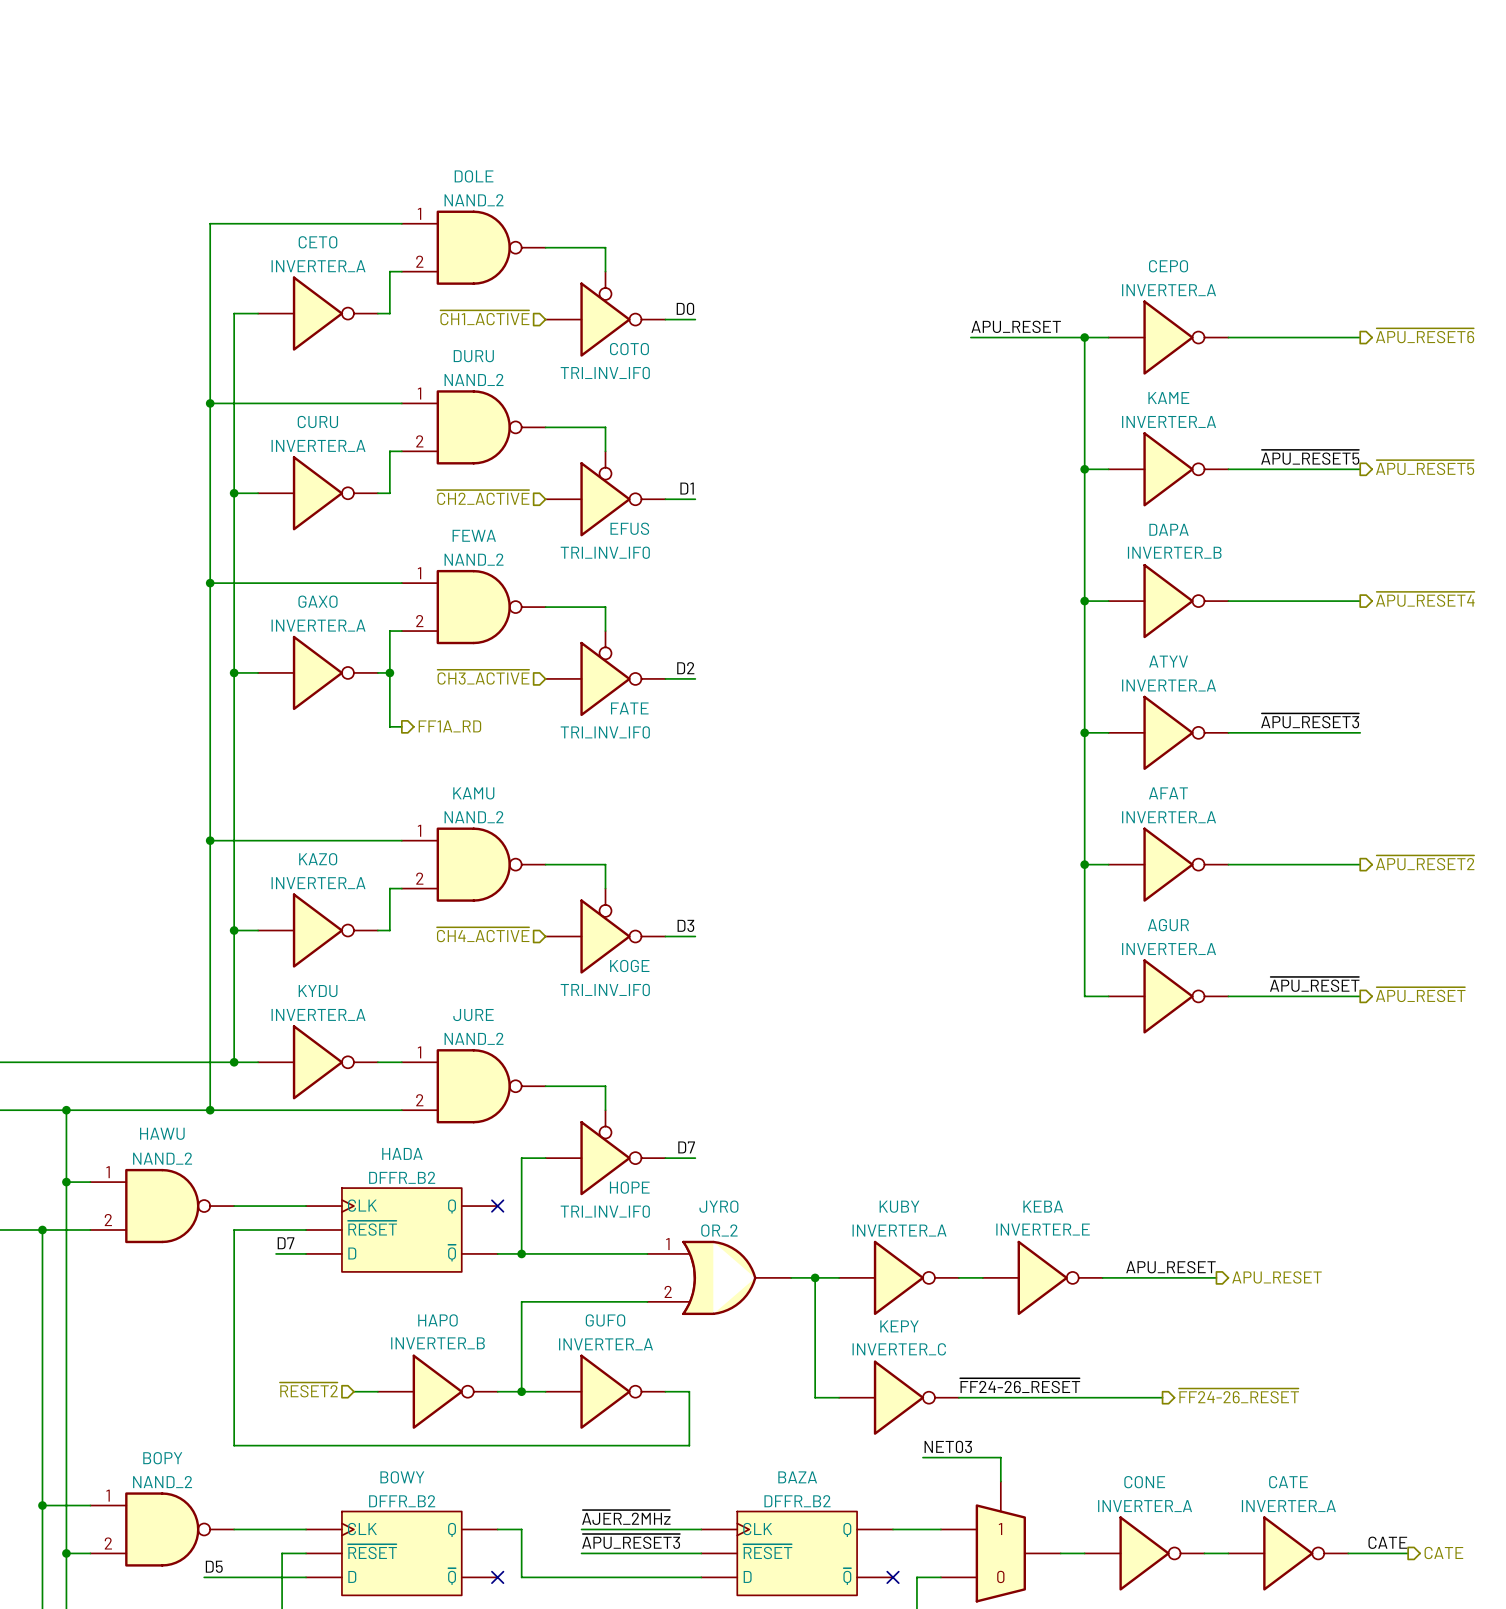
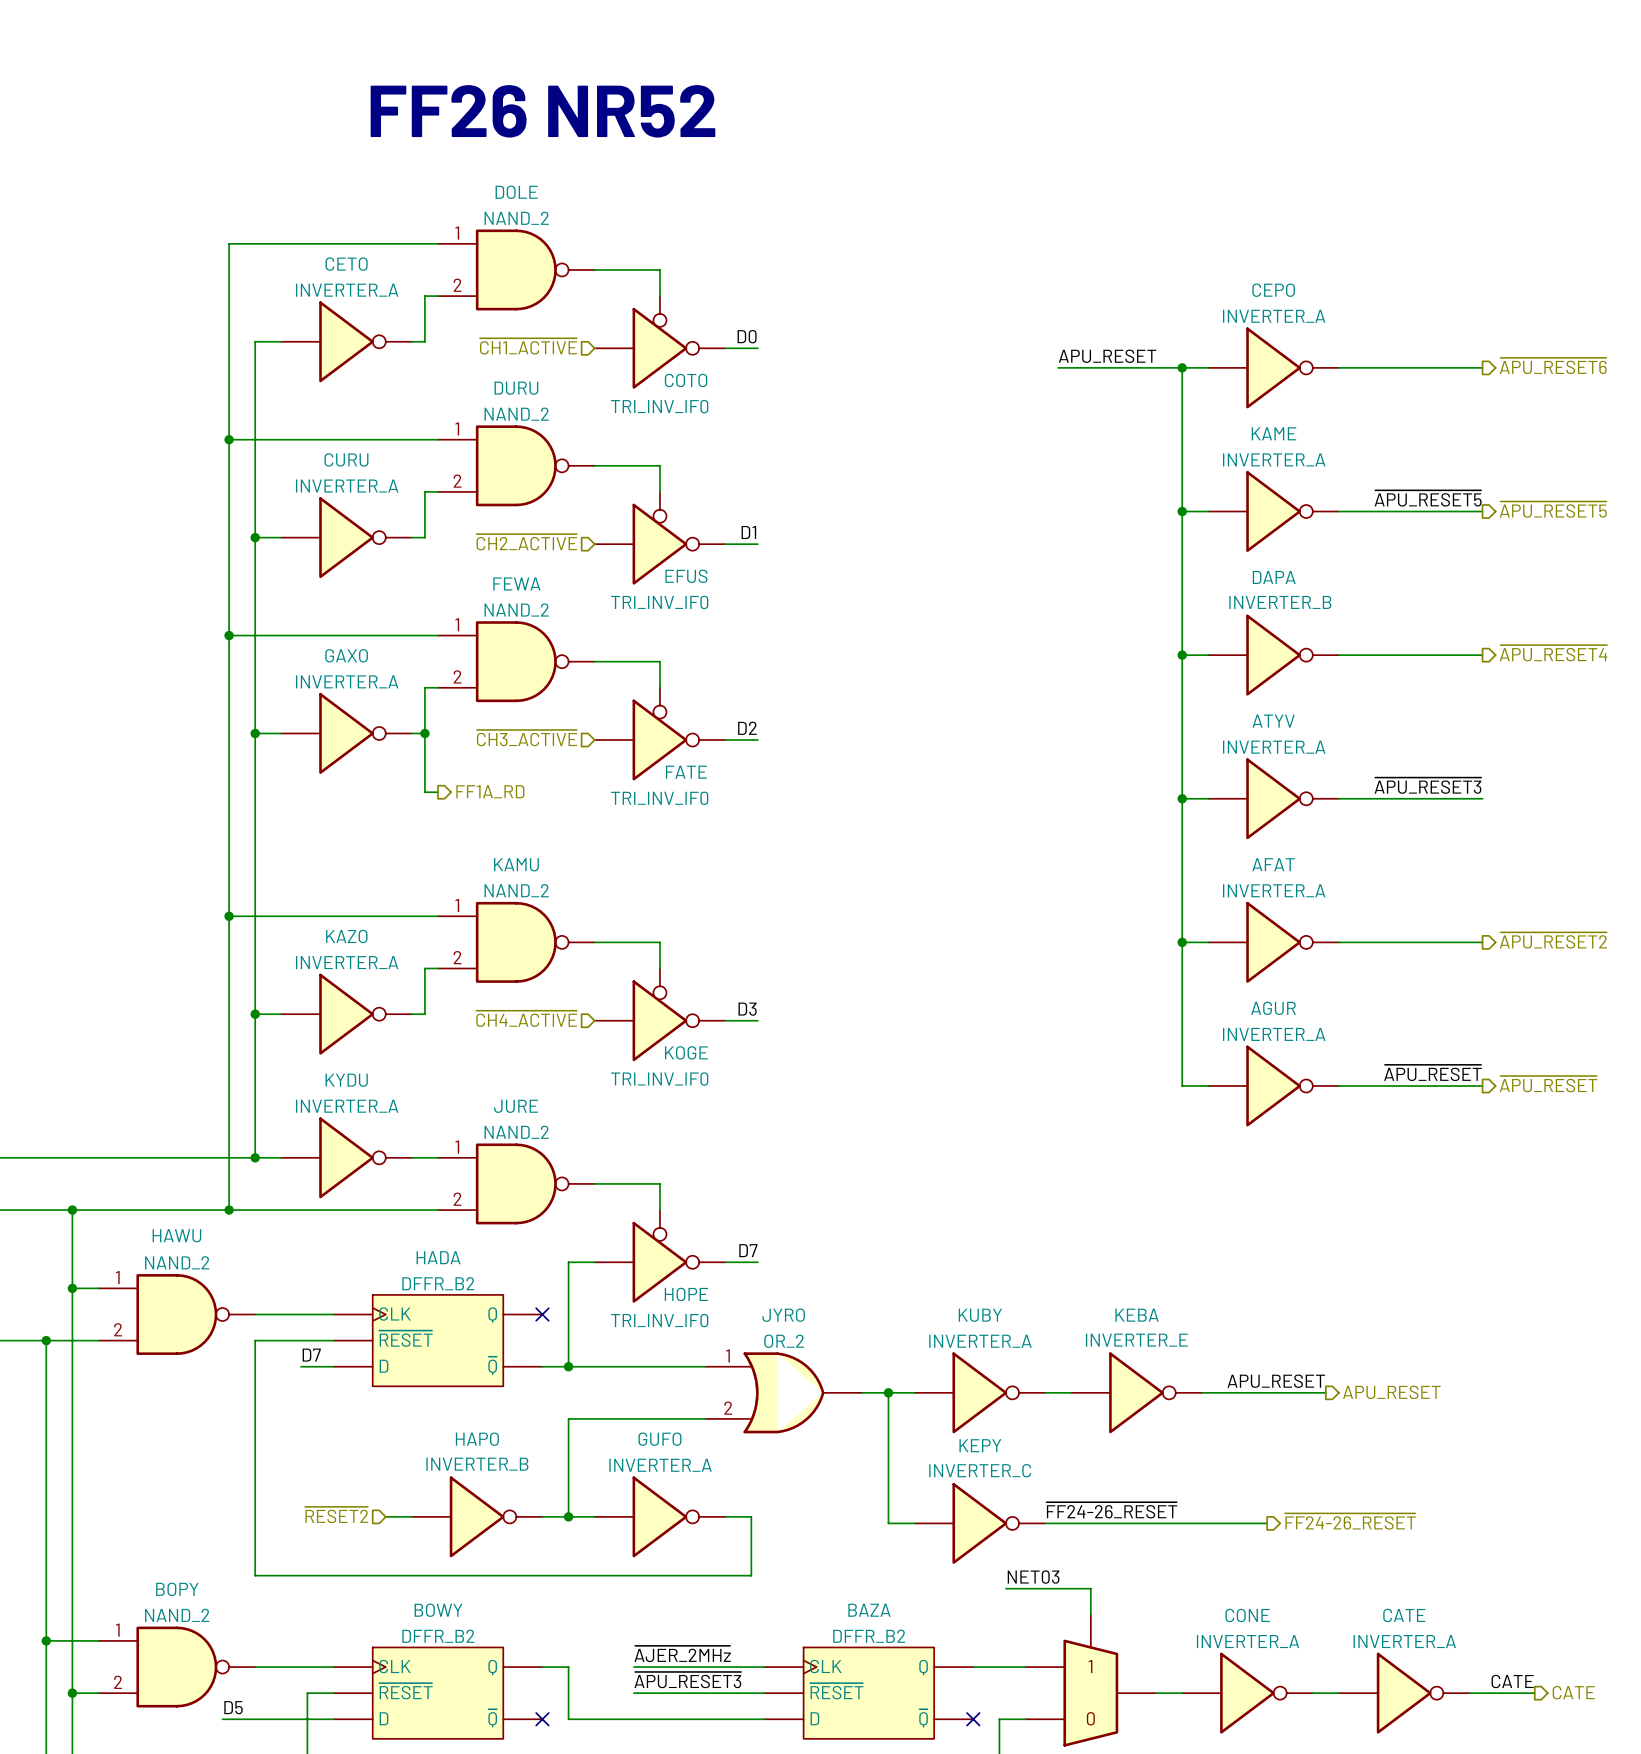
text: none -> FF26 NR52 (542, 111)

